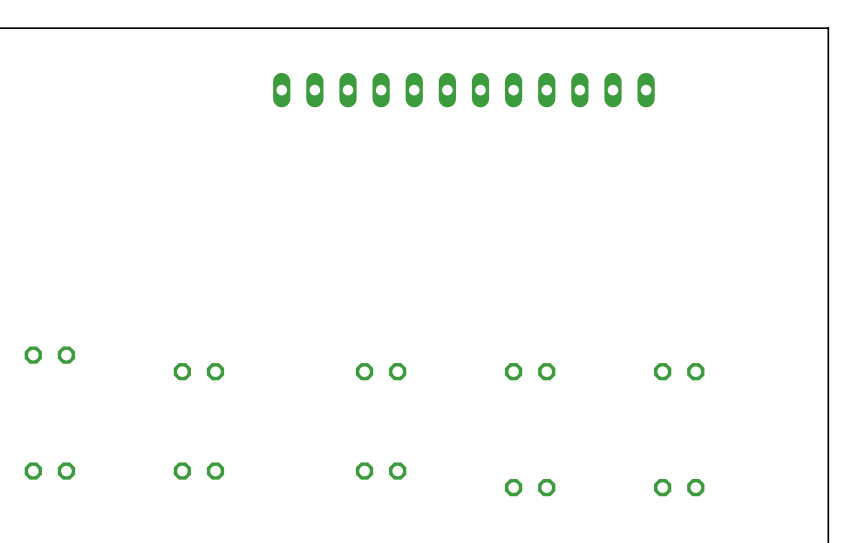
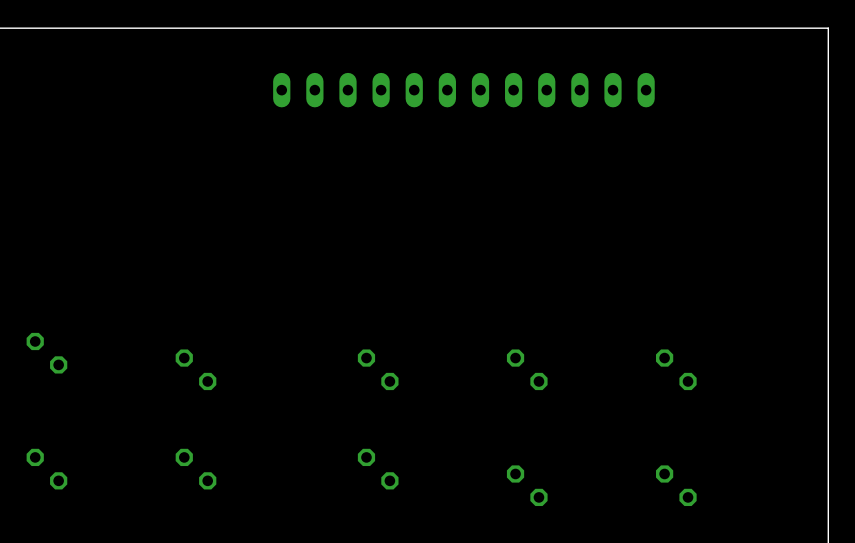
part rotation: 0° (49, 355) -> 45° clockwise (46, 353)
part rotation: 0° (198, 371) -> 45° clockwise (196, 369)
part rotation: 0° (381, 371) -> 45° clockwise (378, 369)
part rotation: 0° (530, 371) -> 45° clockwise (527, 369)
part rotation: 0° (679, 371) -> 45° clockwise (676, 369)
part rotation: 0° (49, 471) -> 45° clockwise (46, 469)
part rotation: 0° (198, 471) -> 45° clockwise (196, 469)
part rotation: 0° (381, 471) -> 45° clockwise (378, 469)
part rotation: 0° (530, 487) -> 45° clockwise (527, 485)
part rotation: 0° (679, 487) -> 45° clockwise (676, 485)

